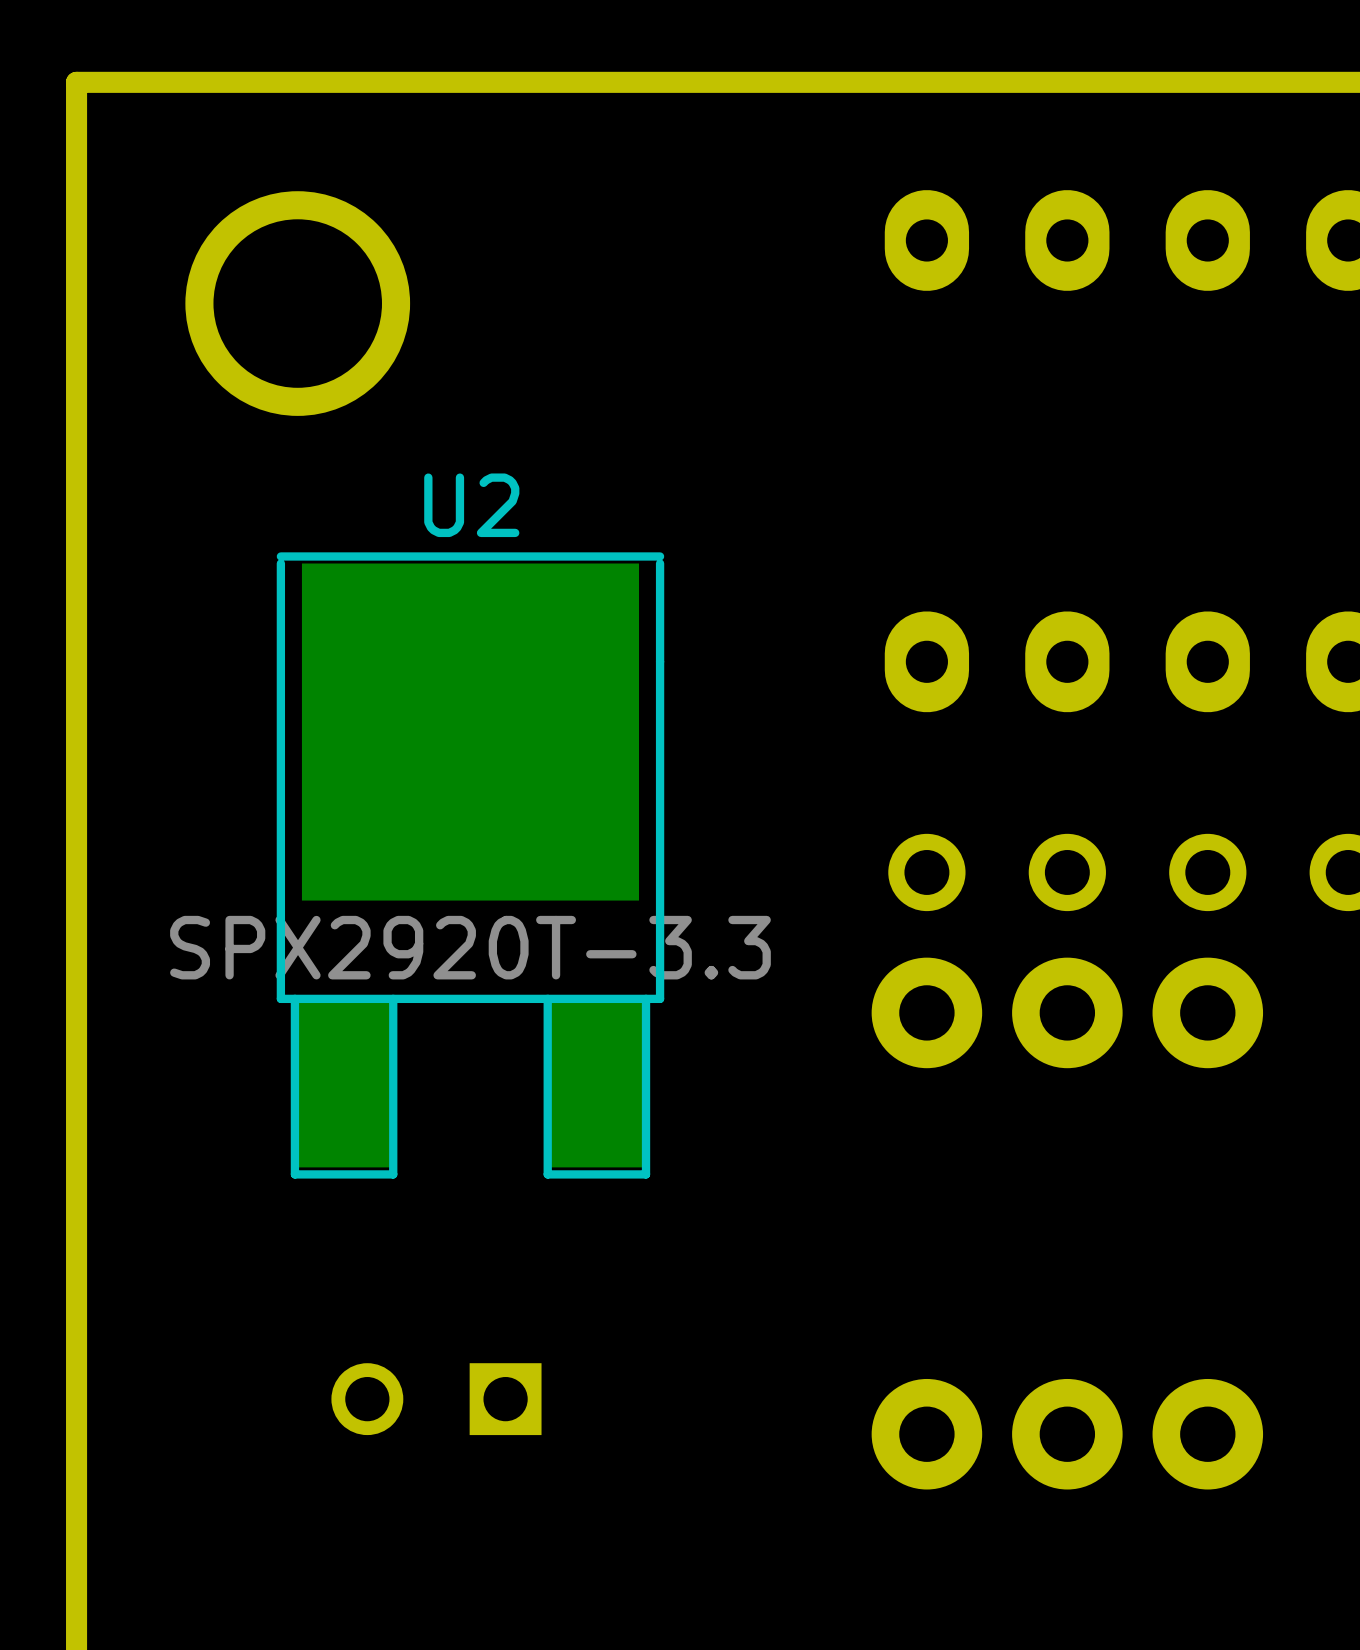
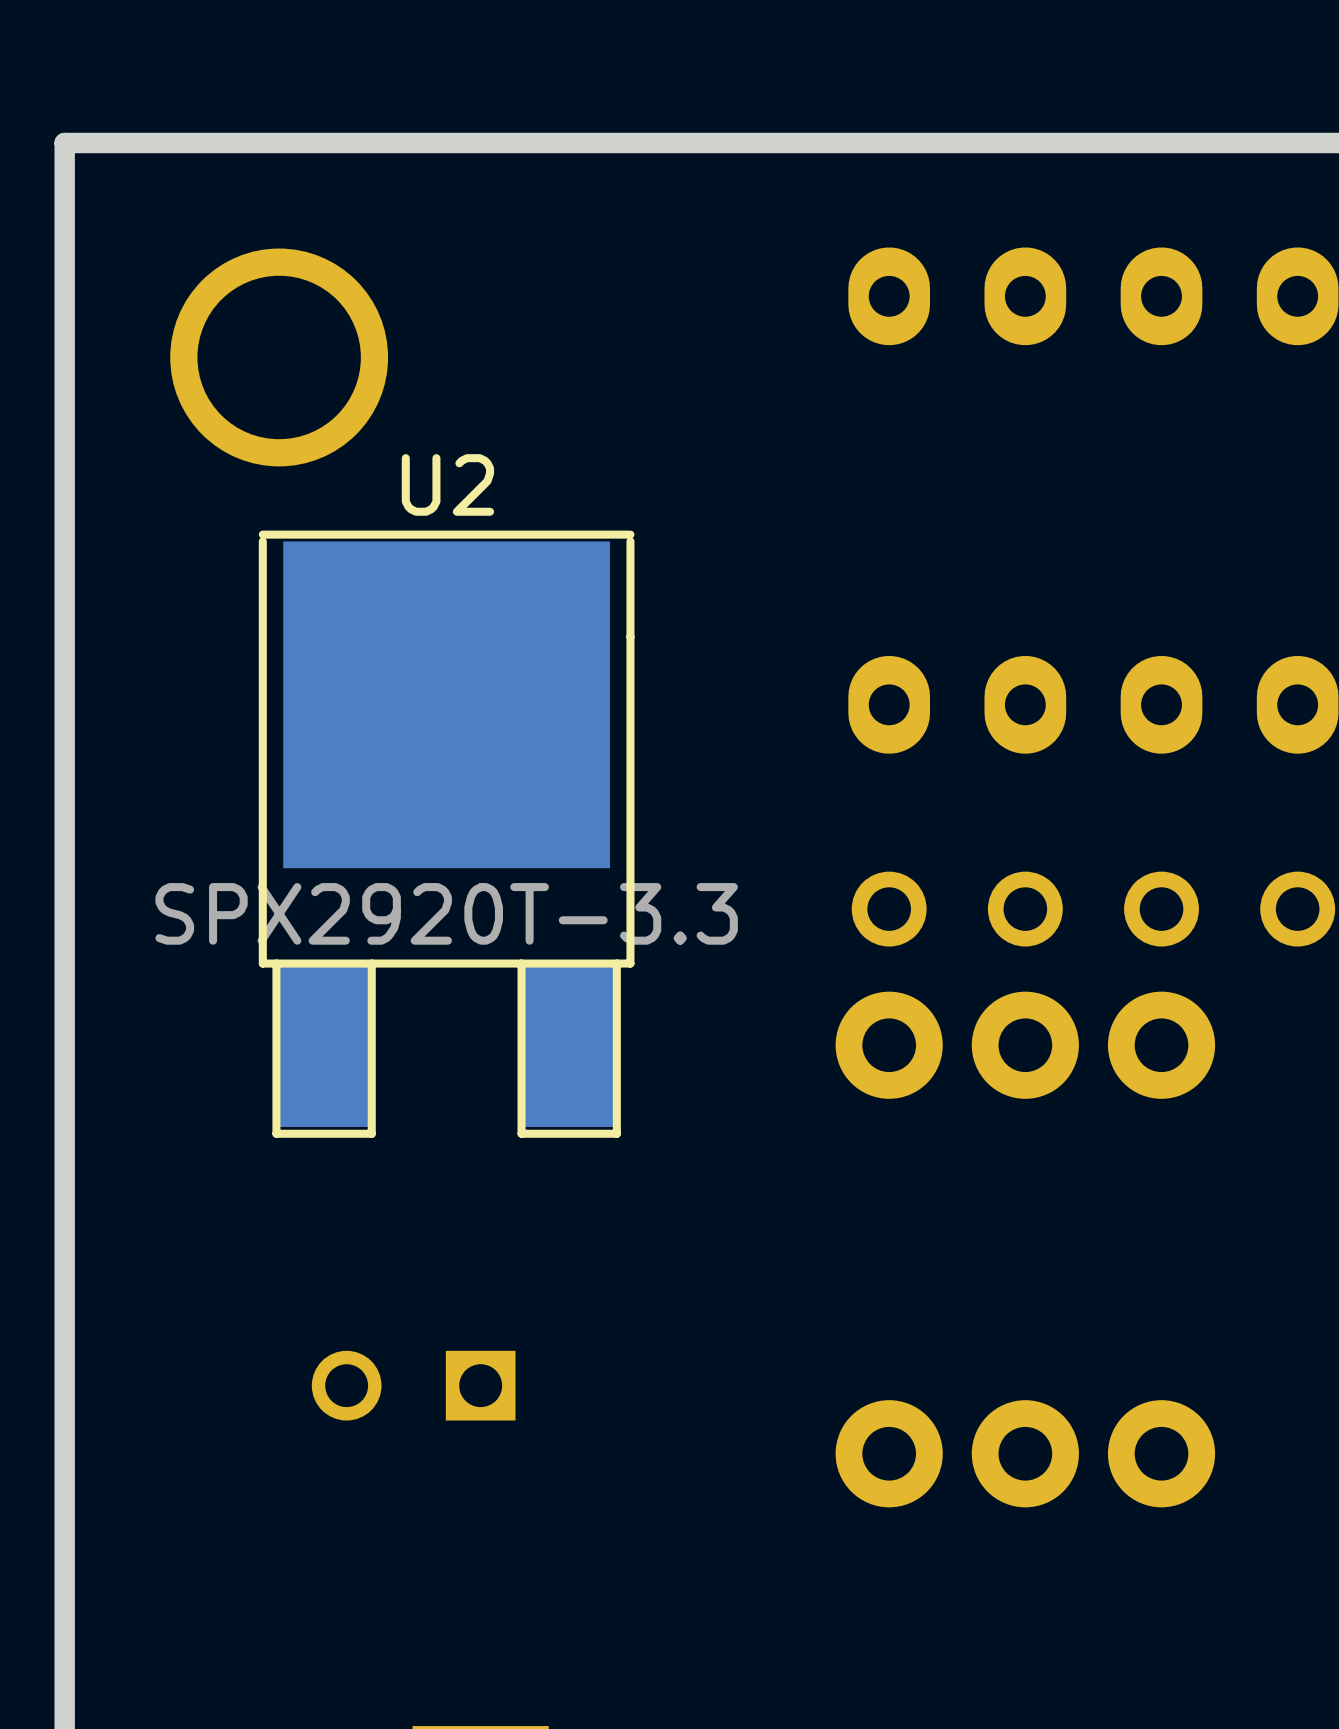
U2 position: (470, 865) -> (446, 834)
part position: (436, 1399) -> (413, 1385)

